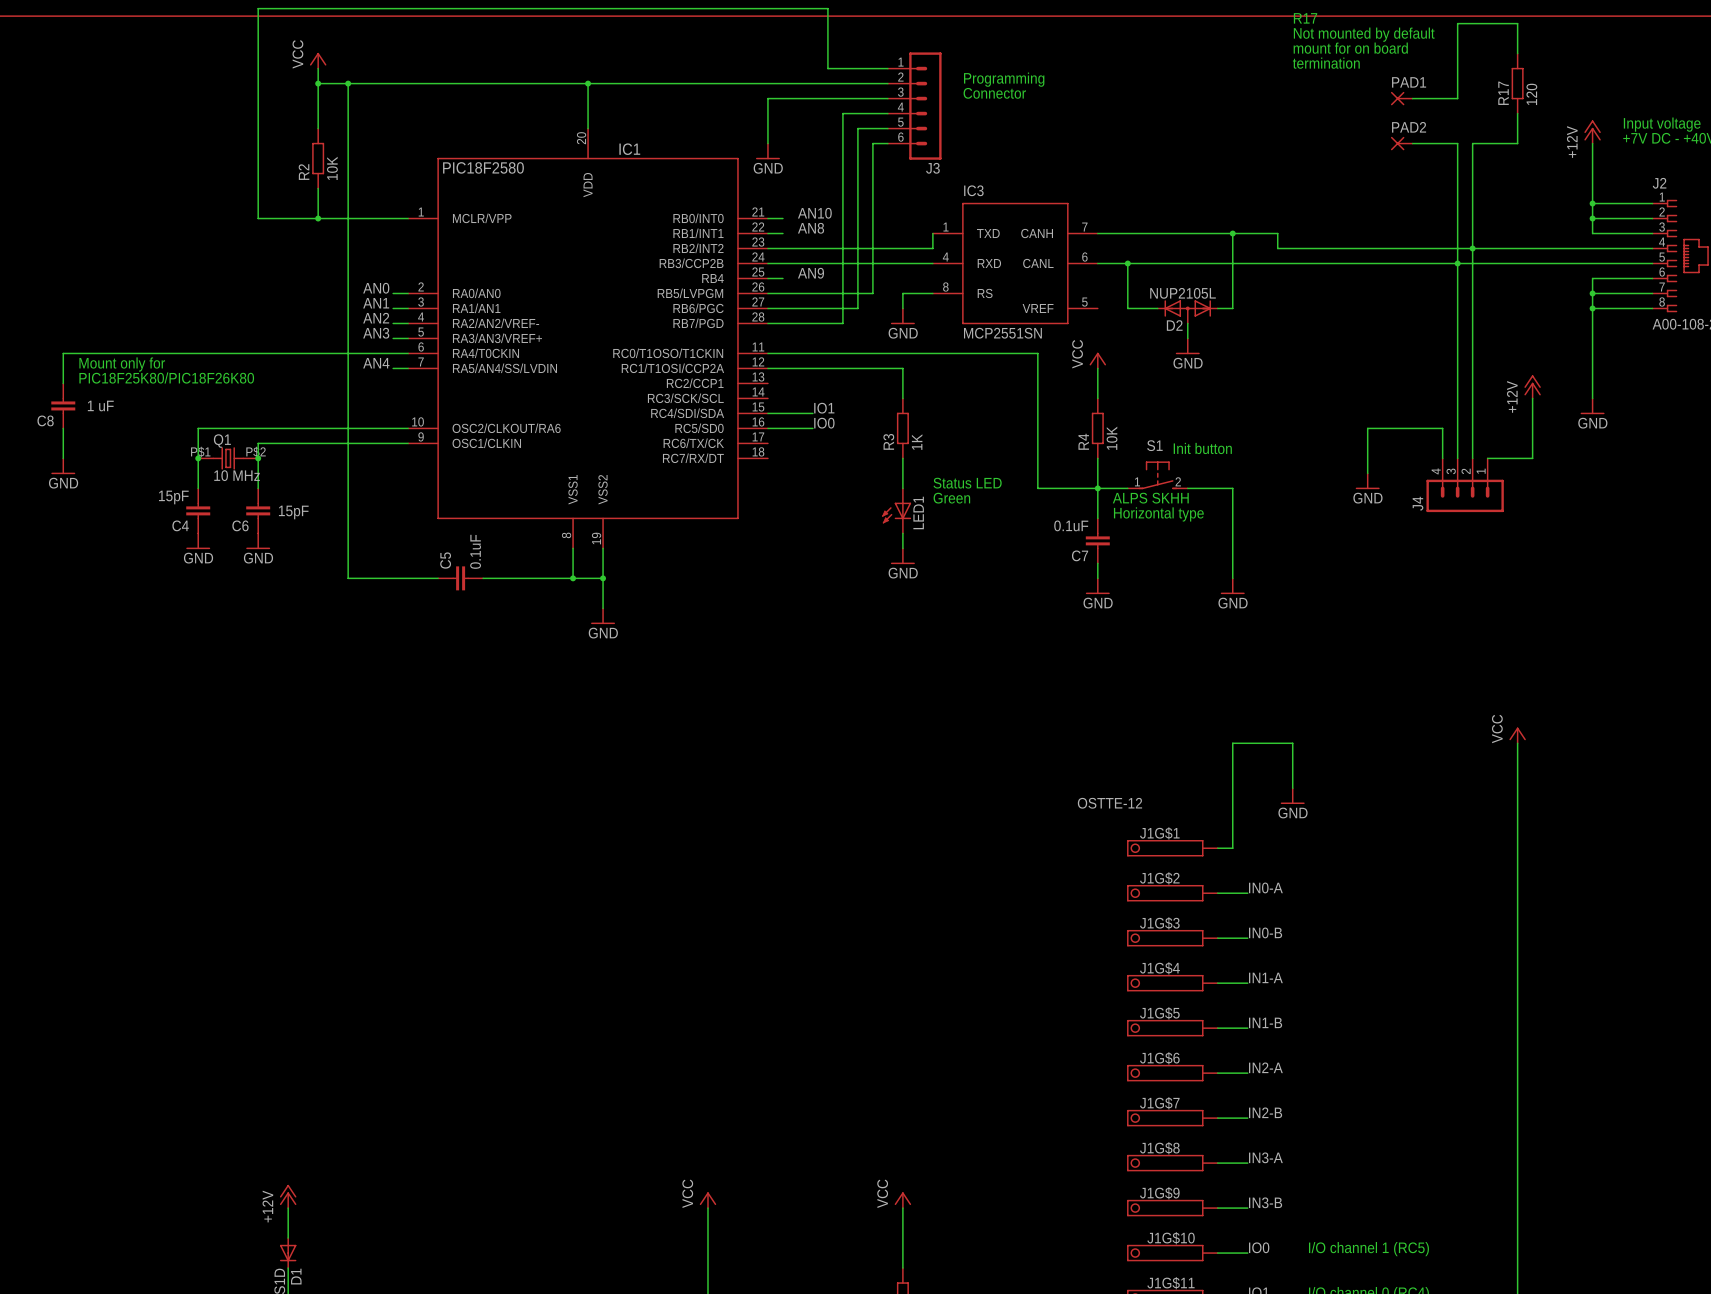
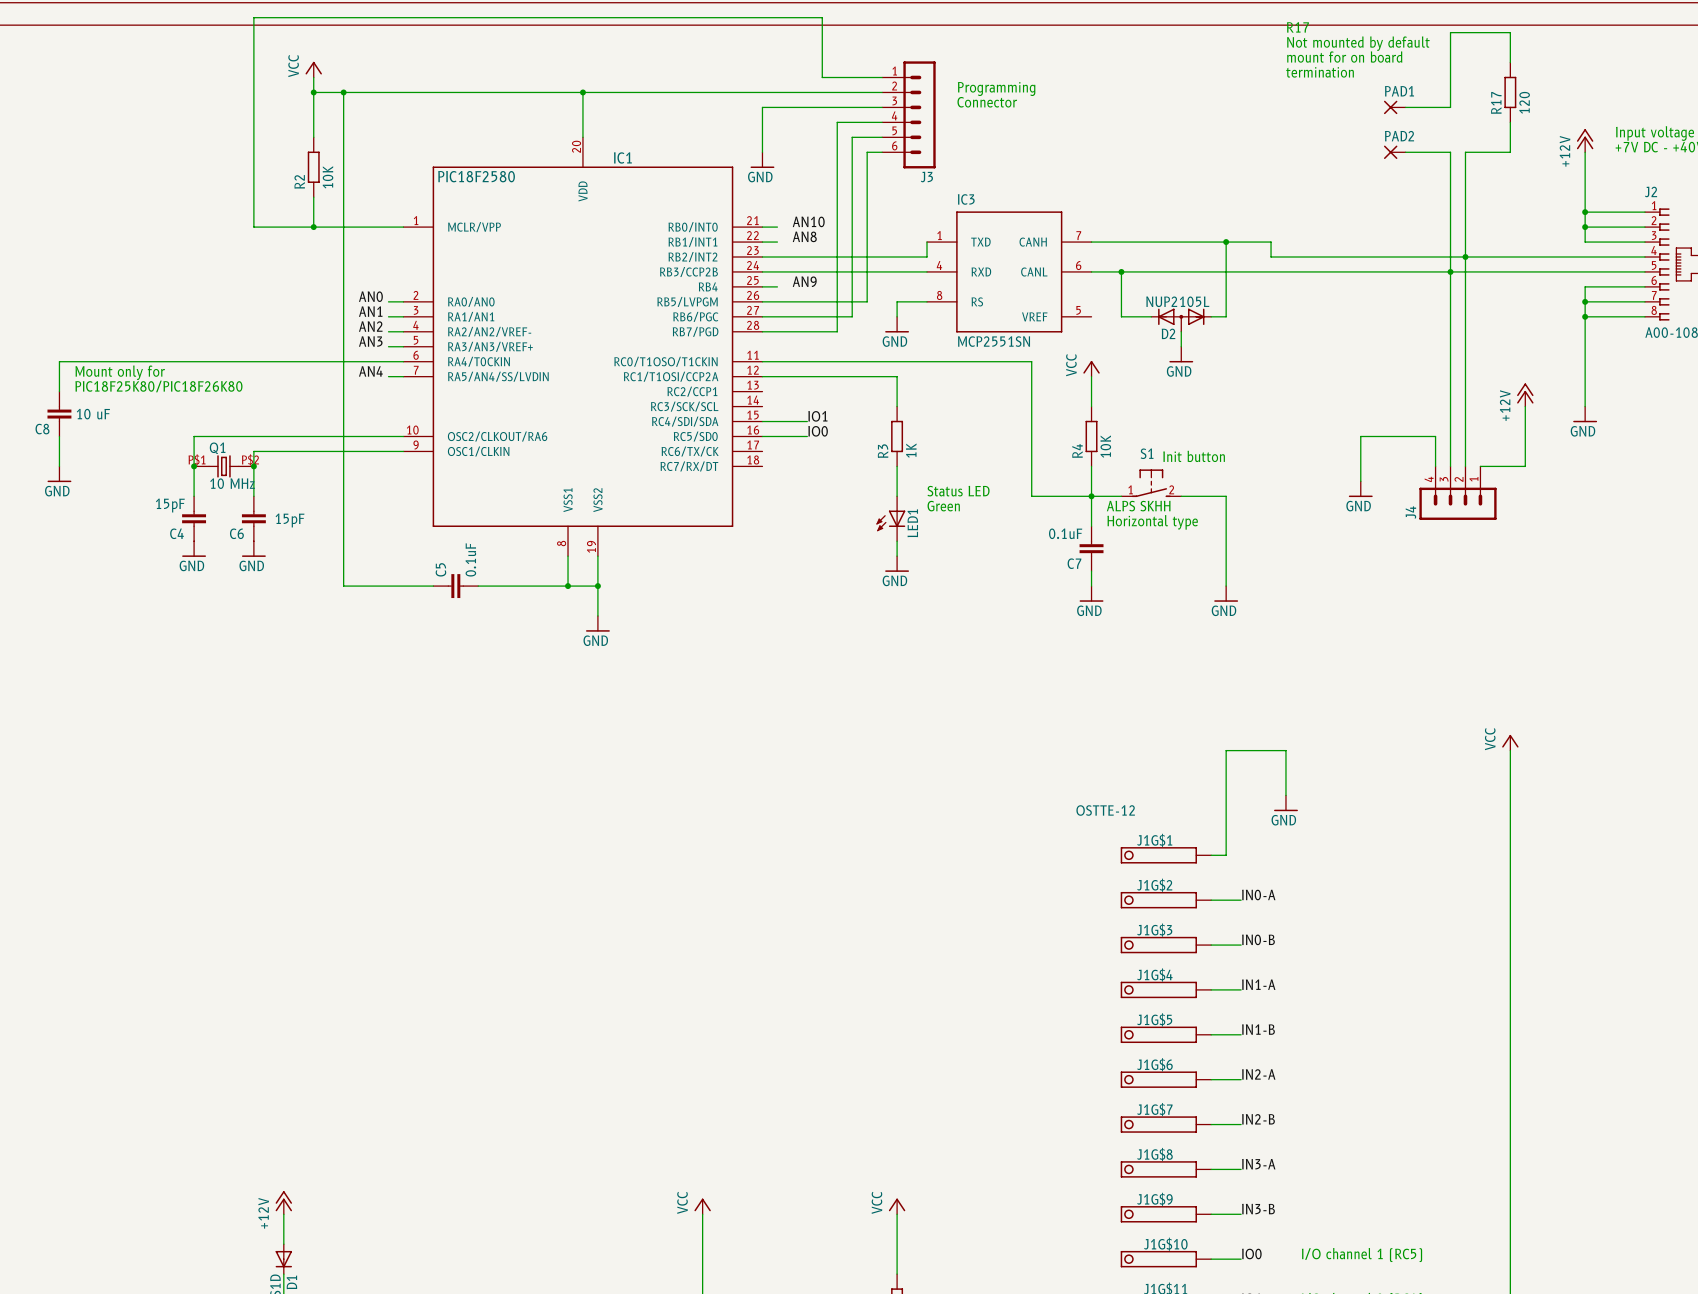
C8 value: 1 uF (100, 406) -> 10 uF (93, 414)

